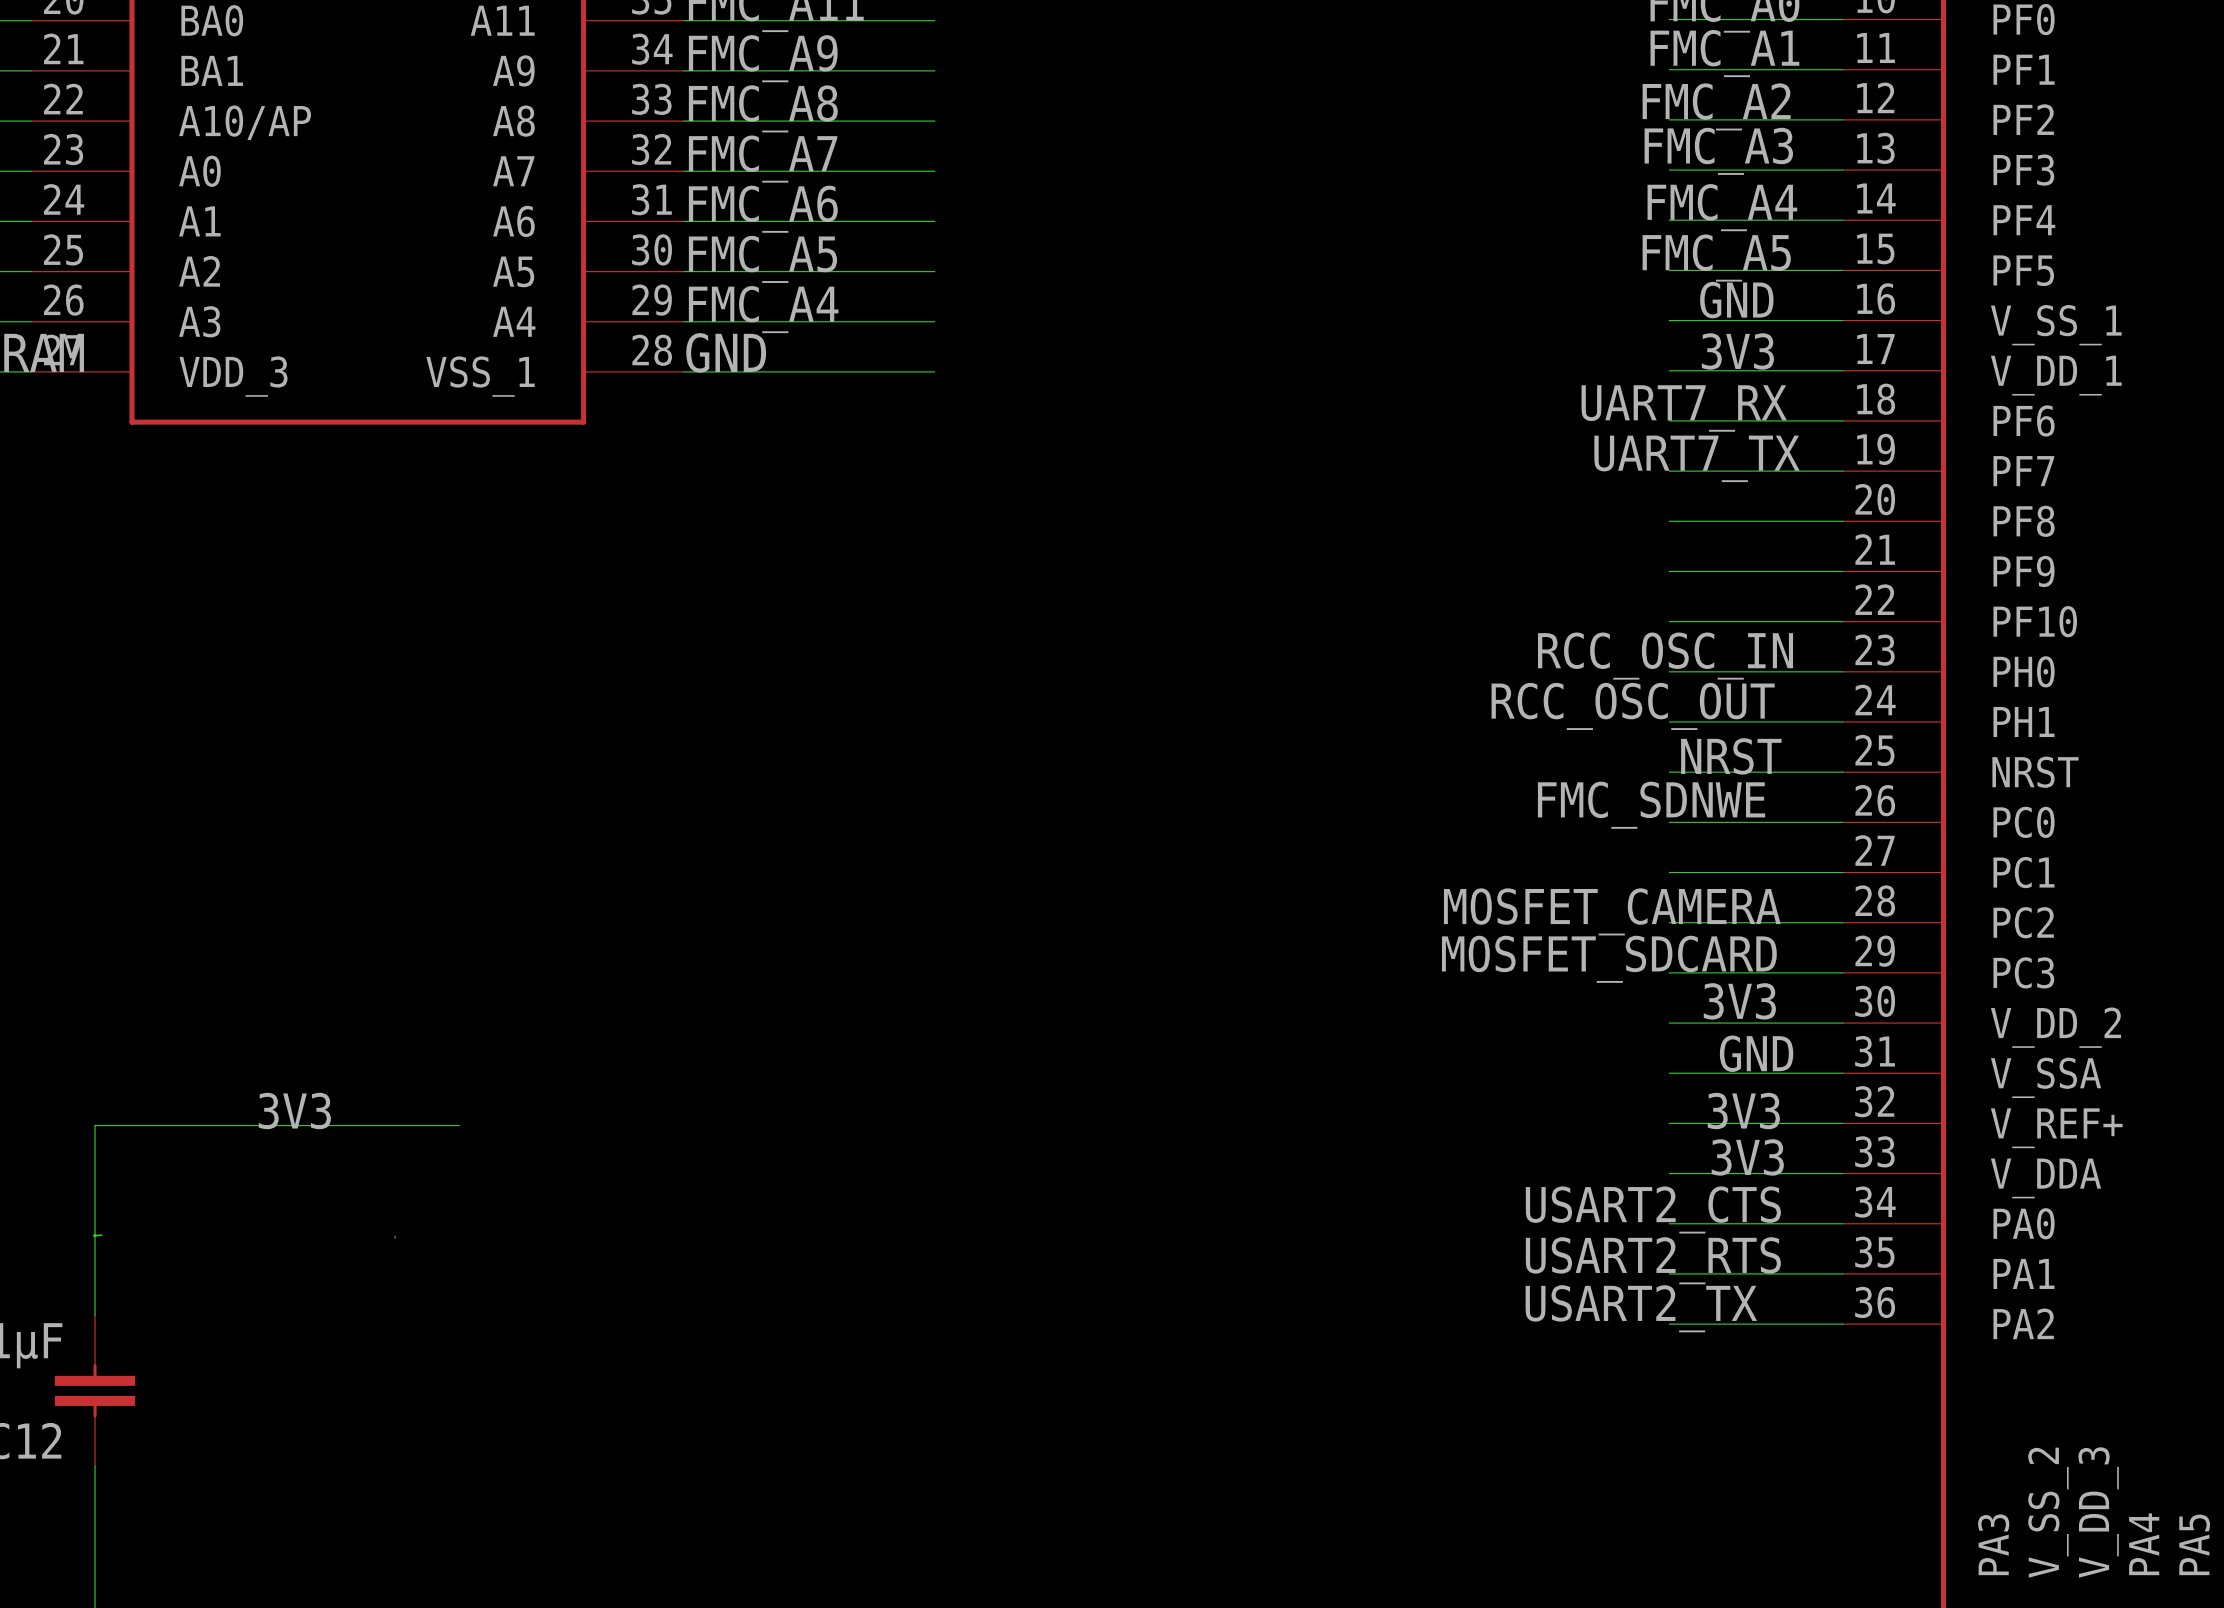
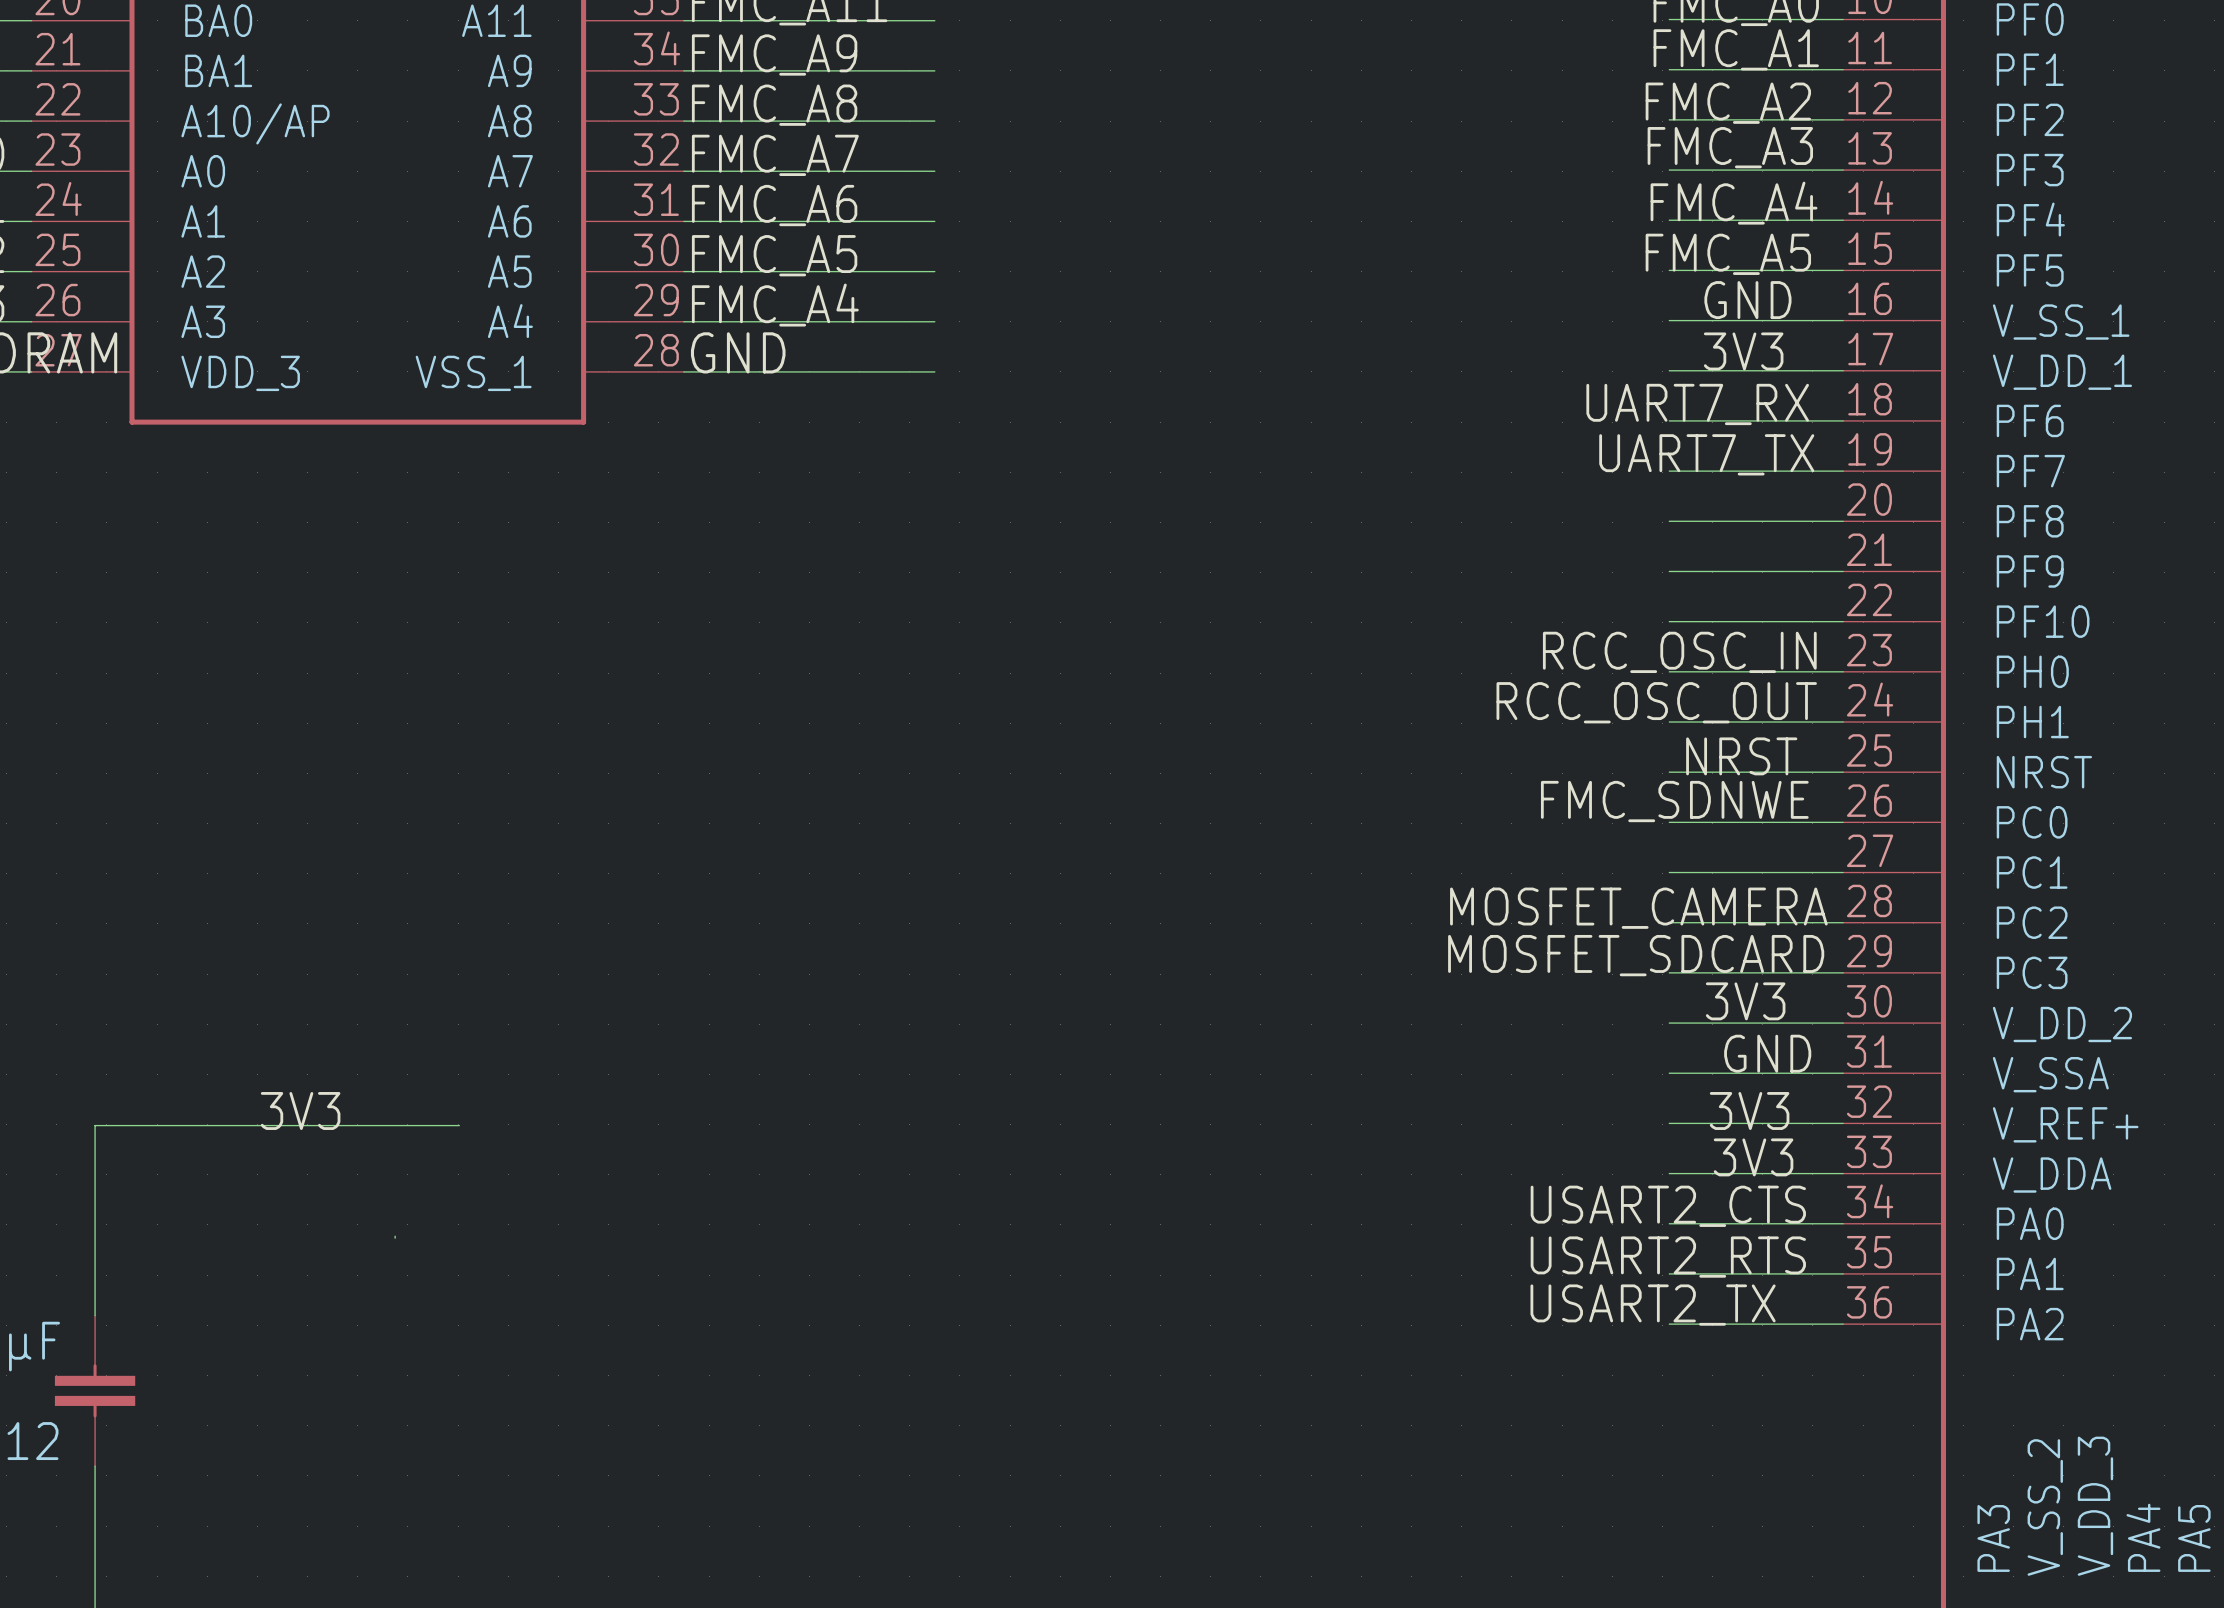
wire: (93, 1236) (101, 1235) (94, 1236) -> none

